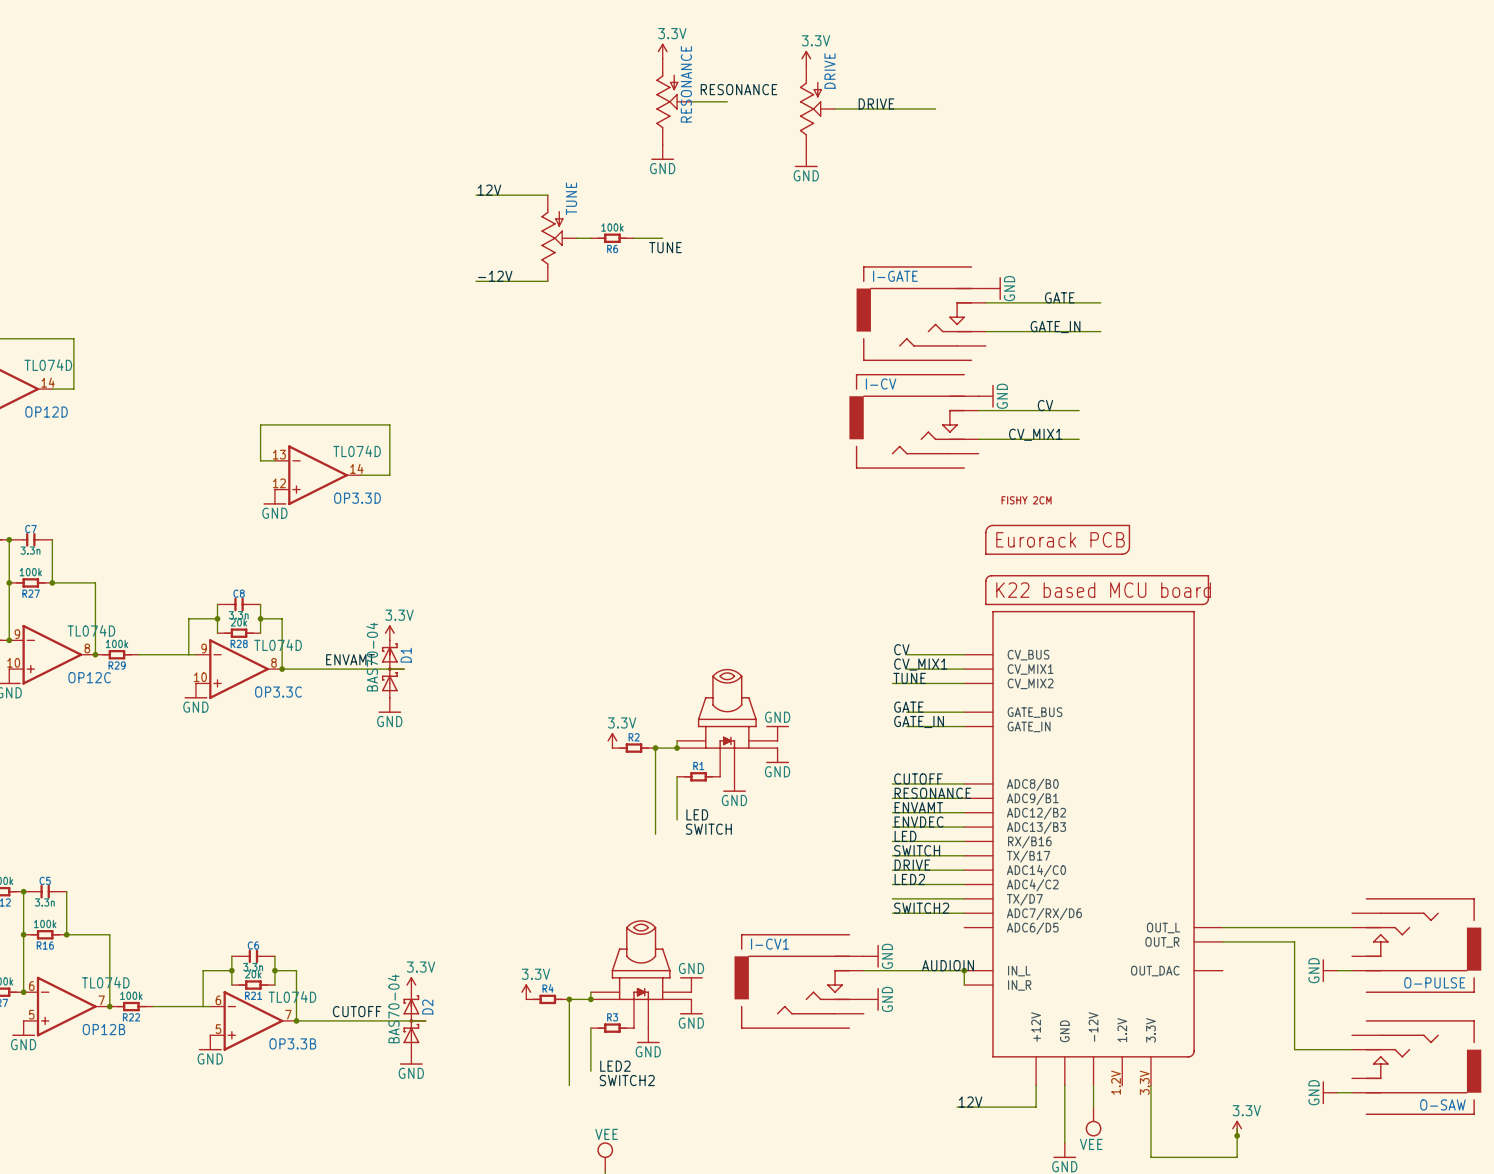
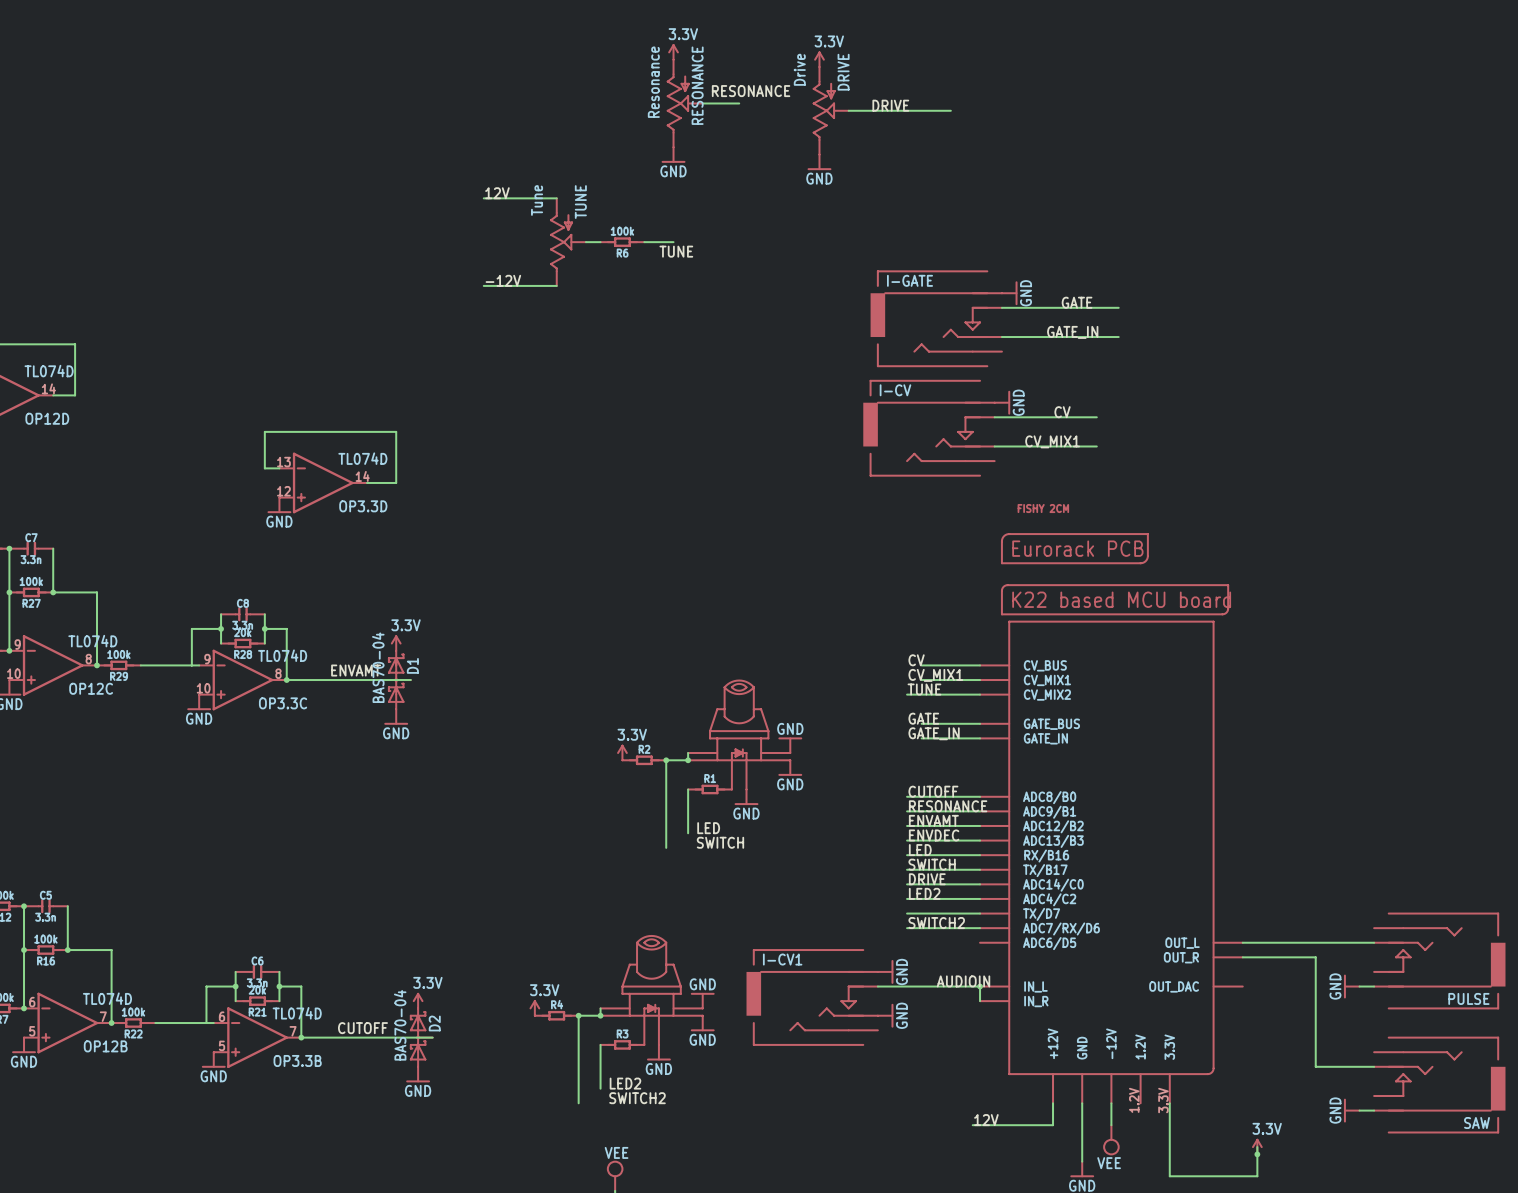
DRIVE value: none -> Drive (799, 69)
RESONANCE value: none -> Resonance (653, 82)
TUNE value: none -> Tune (537, 200)
O-PULSE name: O-PULSE (1434, 982) -> PULSE (1468, 998)
O-SAW name: O-SAW (1442, 1104) -> SAW (1477, 1123)

